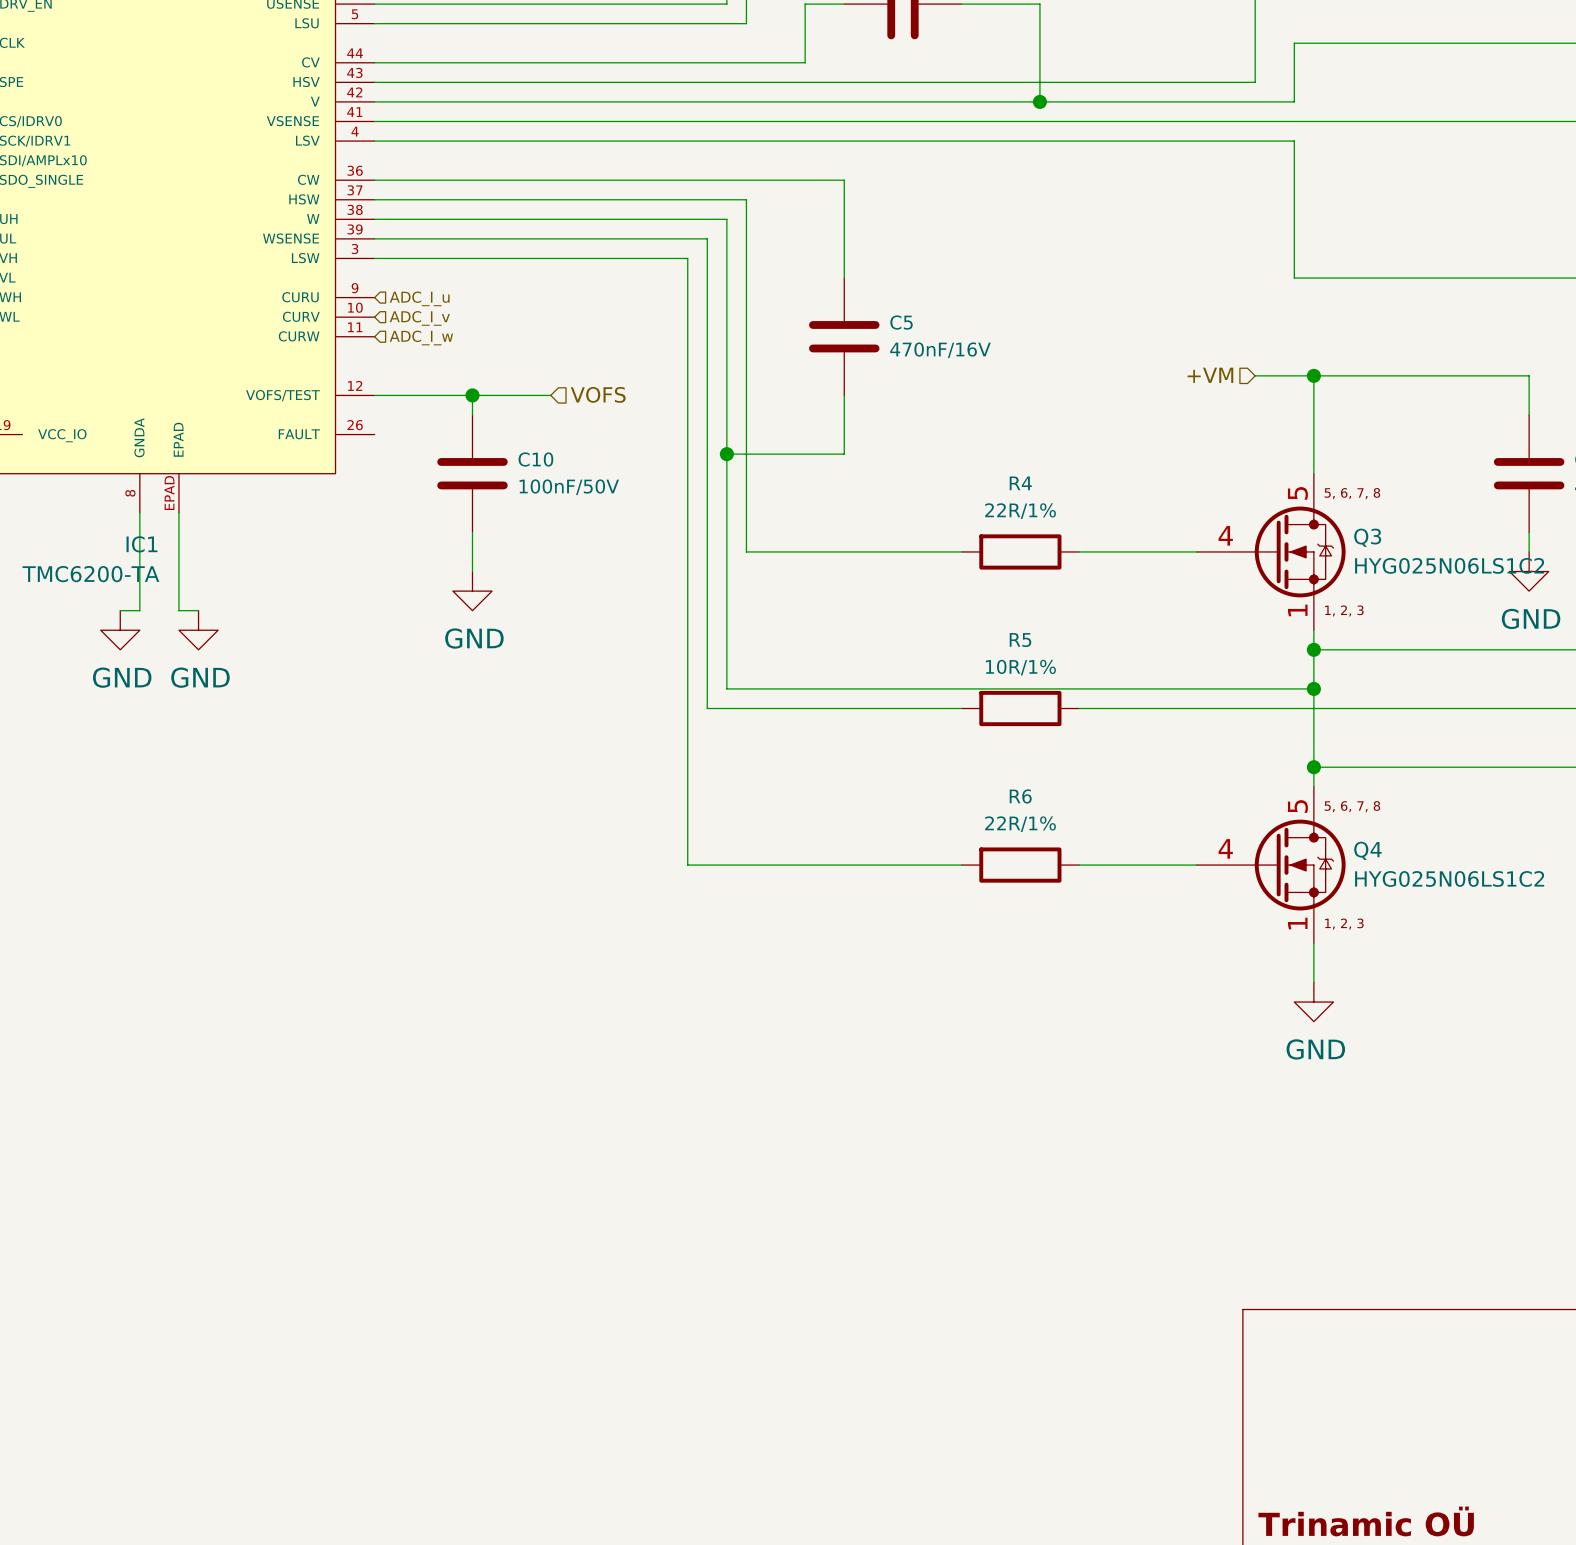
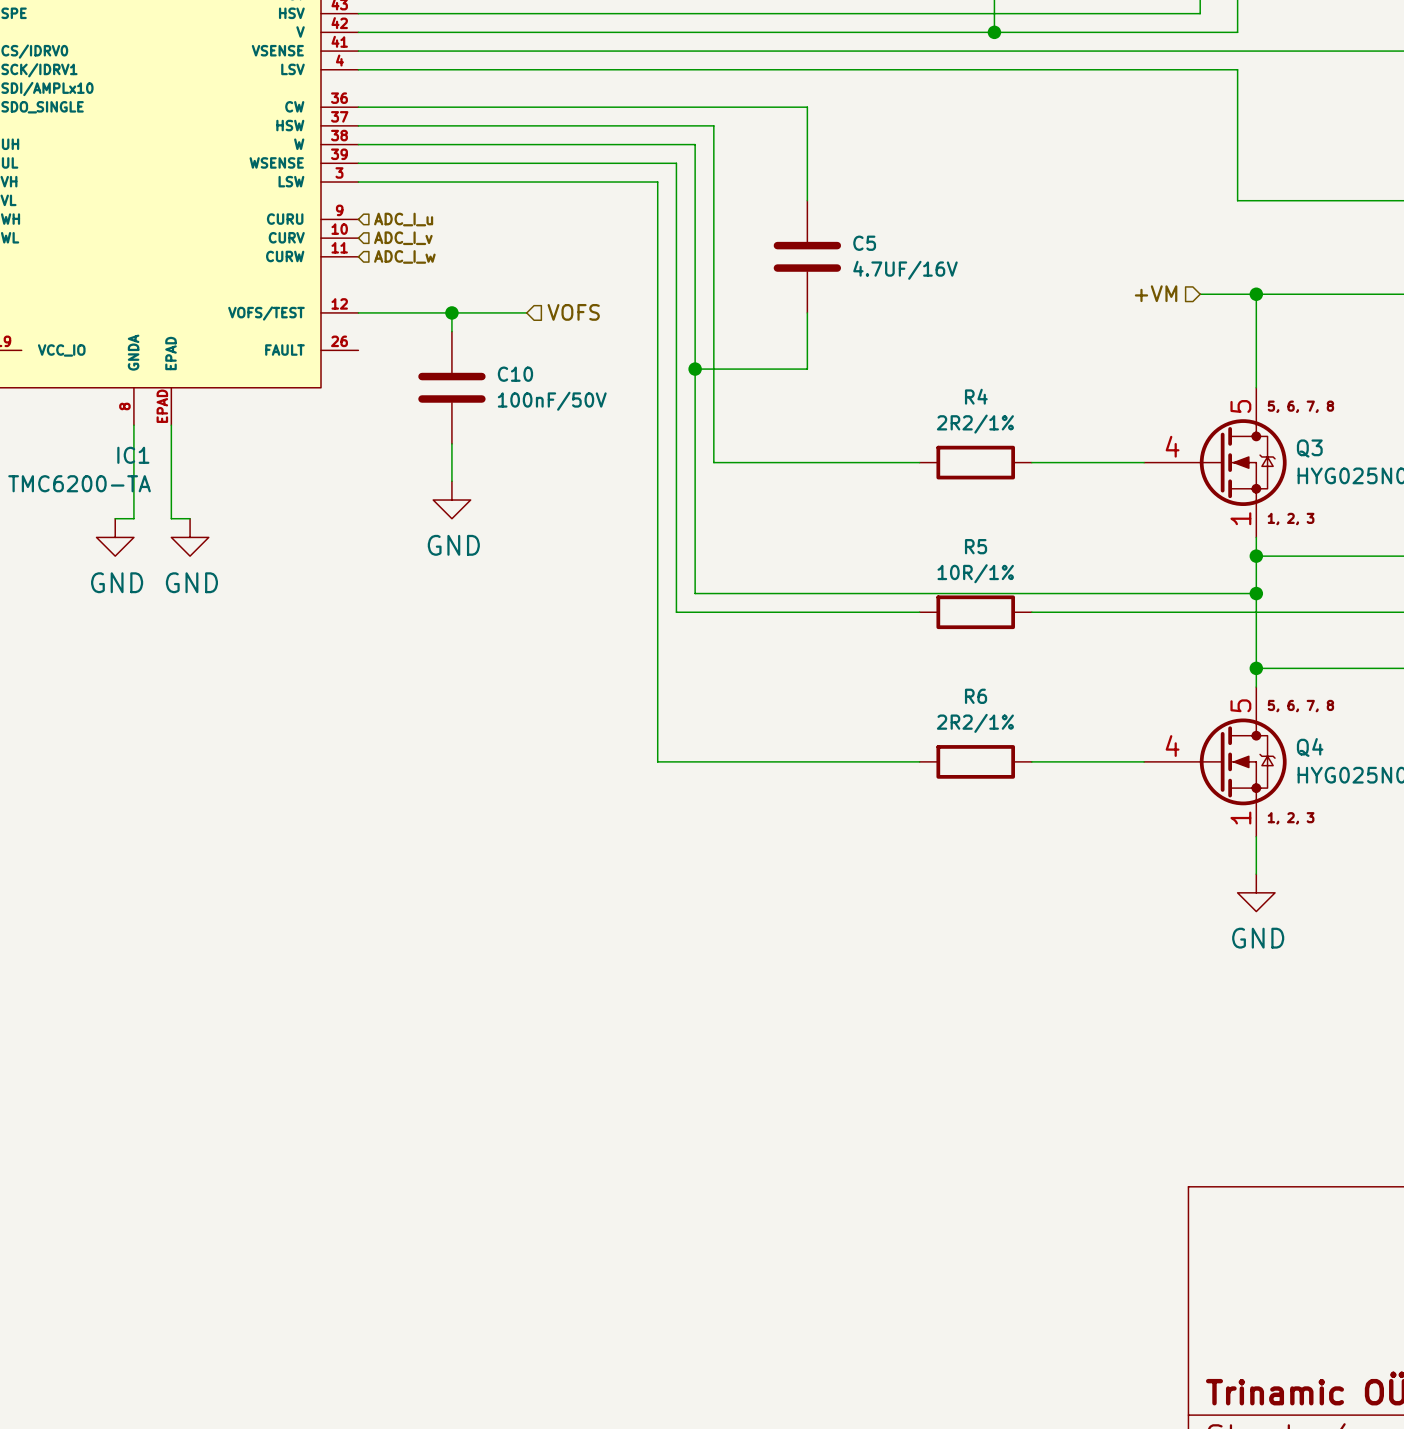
C5 value: 470nF/16V (940, 350) -> 4.7UF/16V (905, 270)
R4 value: 22R/1% (1020, 511) -> 2R2/1% (975, 424)
R6 value: 22R/1% (1020, 824) -> 2R2/1% (975, 723)

